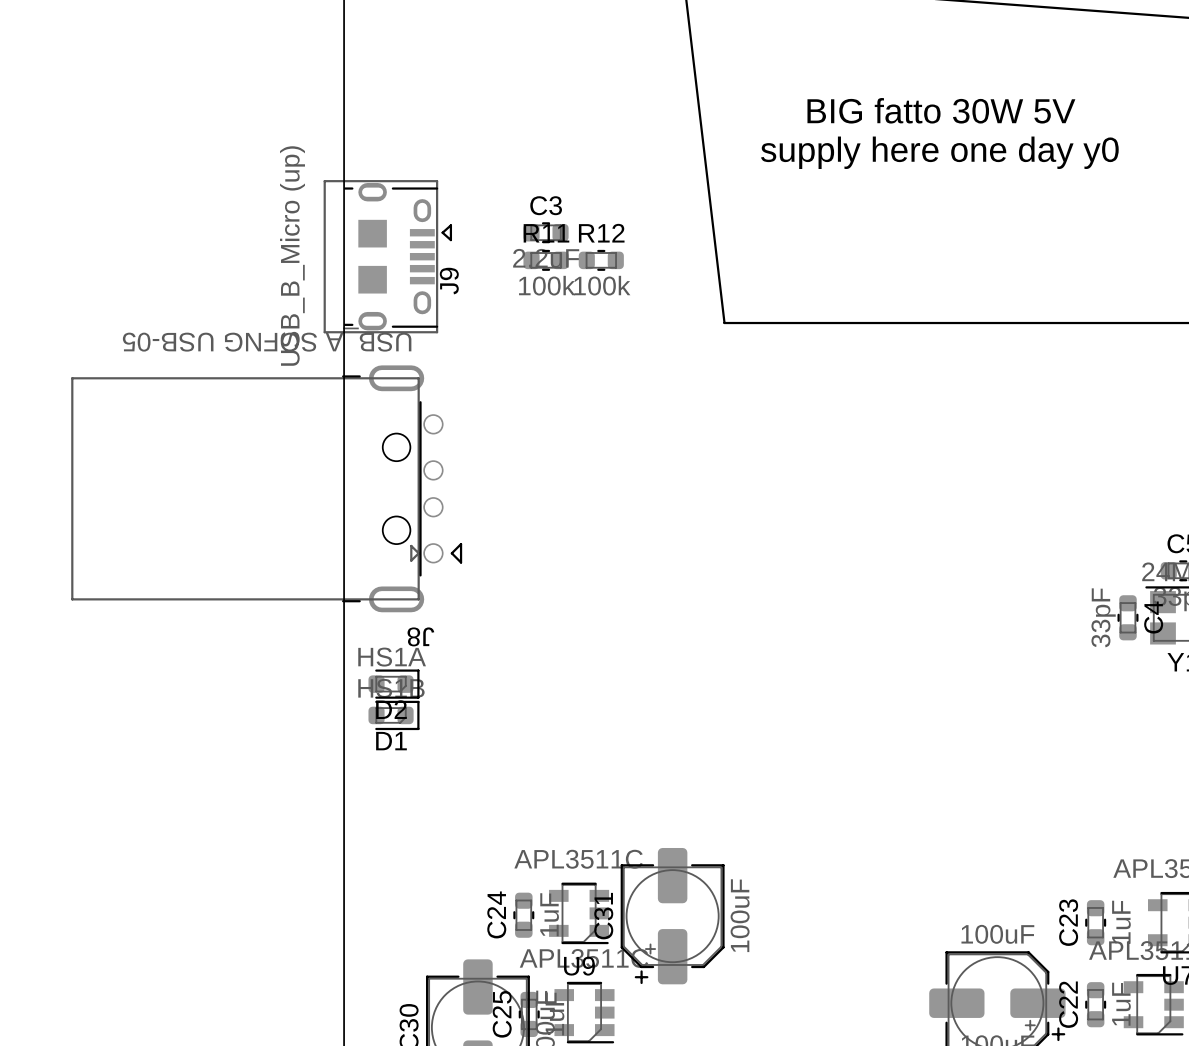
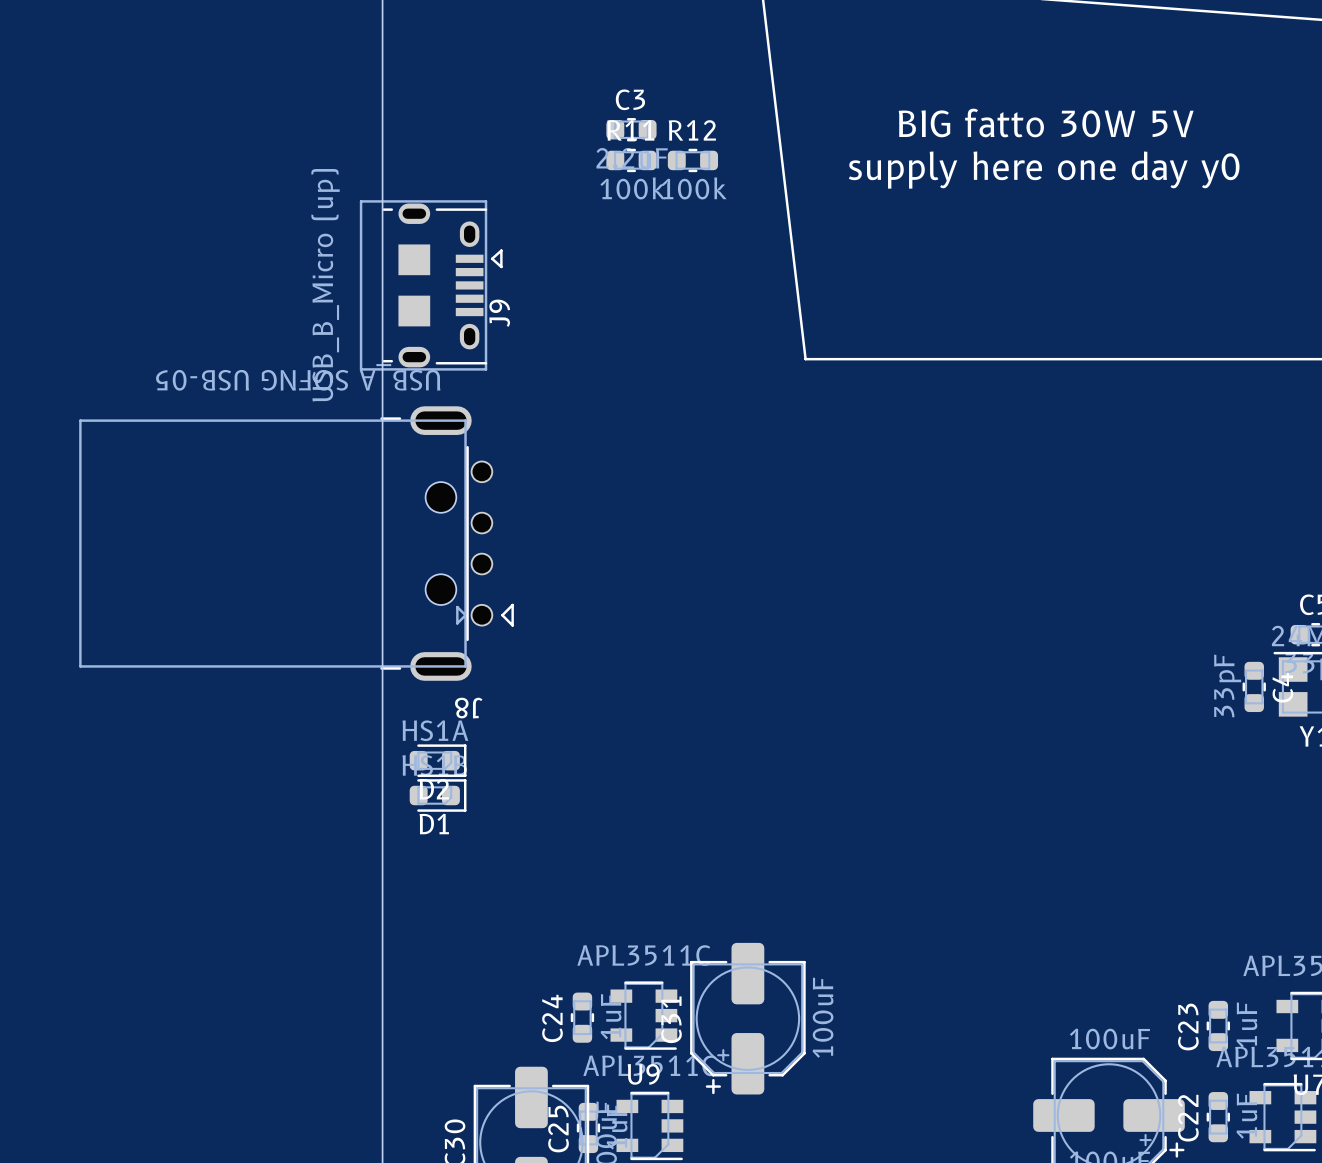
C3 position: (546, 232) -> (631, 129)
R11 position: (546, 260) -> (631, 160)
R12 position: (601, 260) -> (692, 160)

